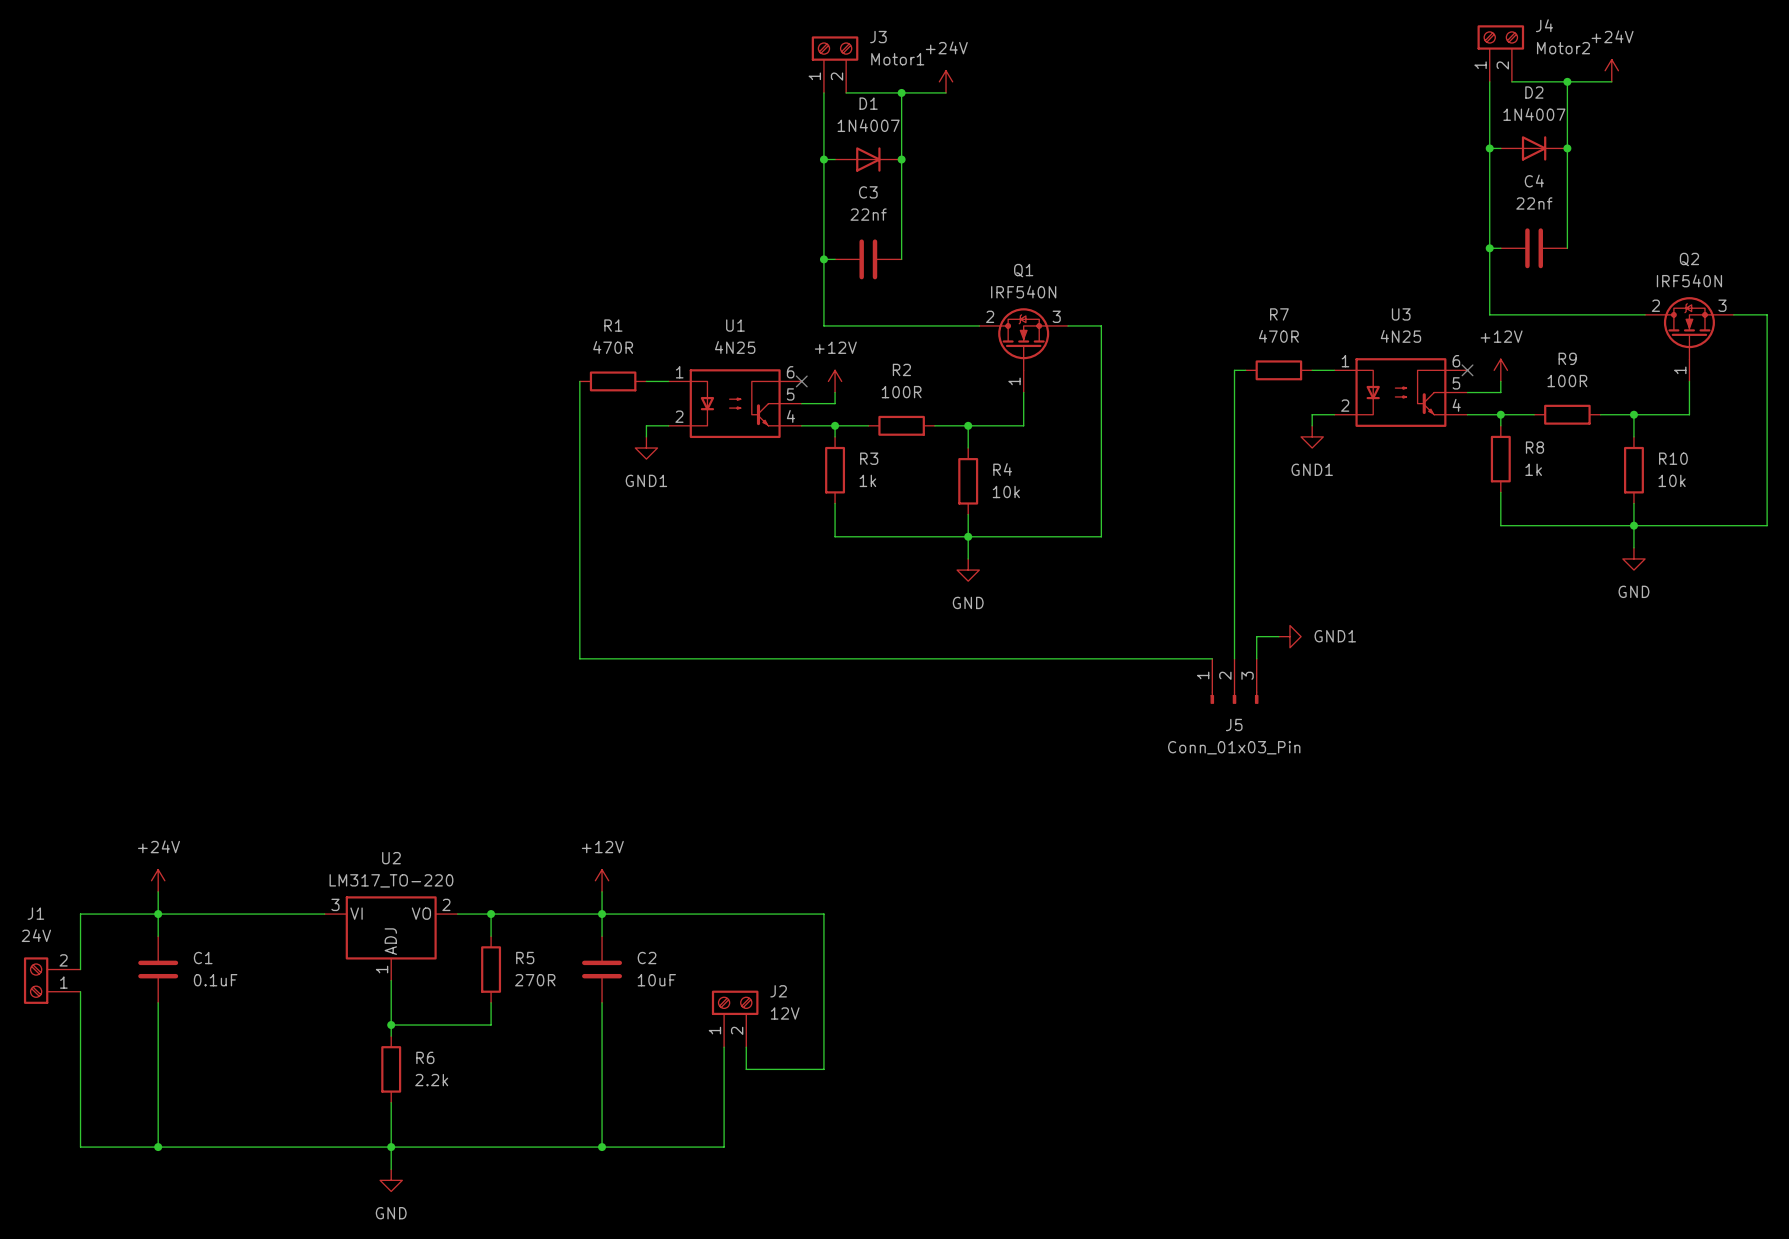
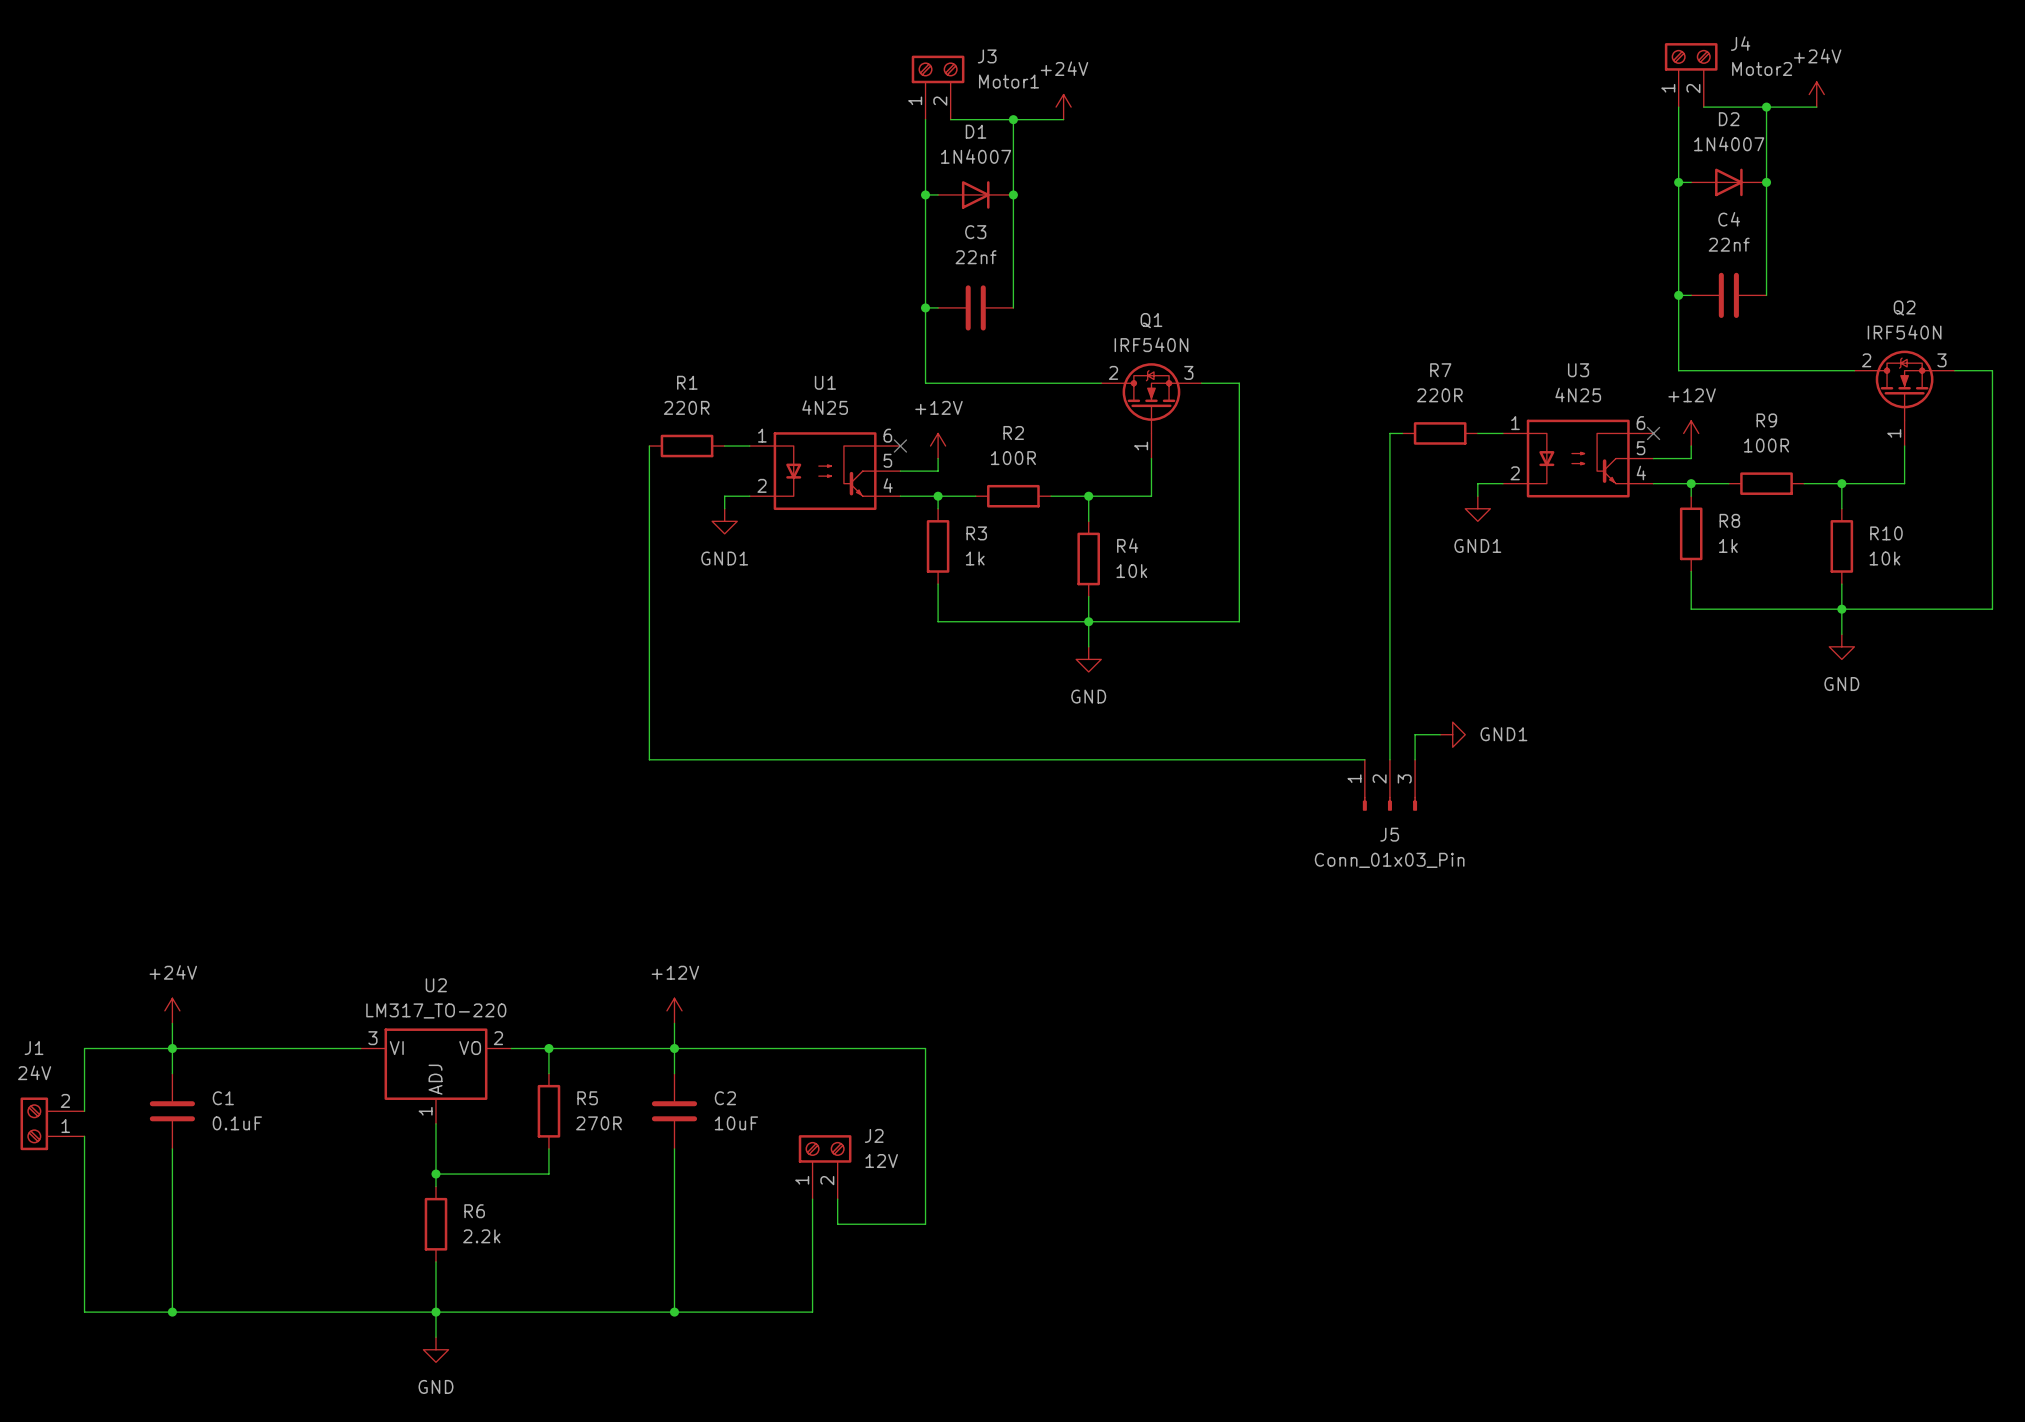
R7 value: 470R (1278, 336) -> 220R (1439, 395)
R1 value: 470R (613, 347) -> 220R (686, 407)

